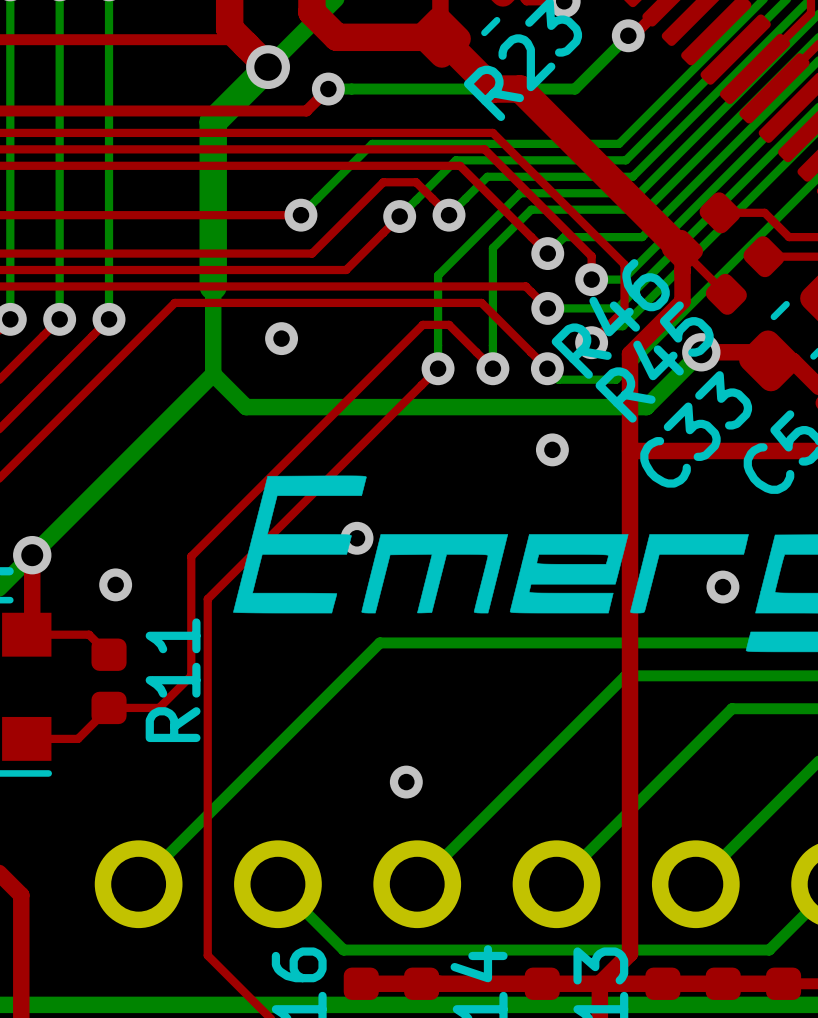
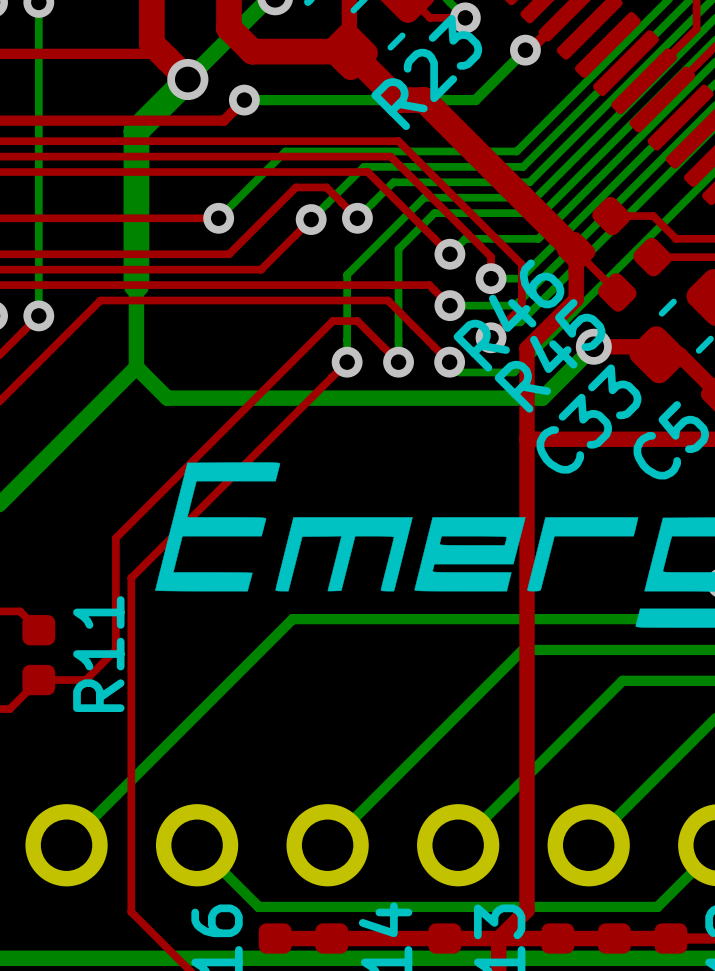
via: (281, 338) -> none
via: (552, 449) -> none
via: (357, 538) -> none
via: (115, 584) -> none
via: (722, 587) -> none
via: (406, 782) -> none

